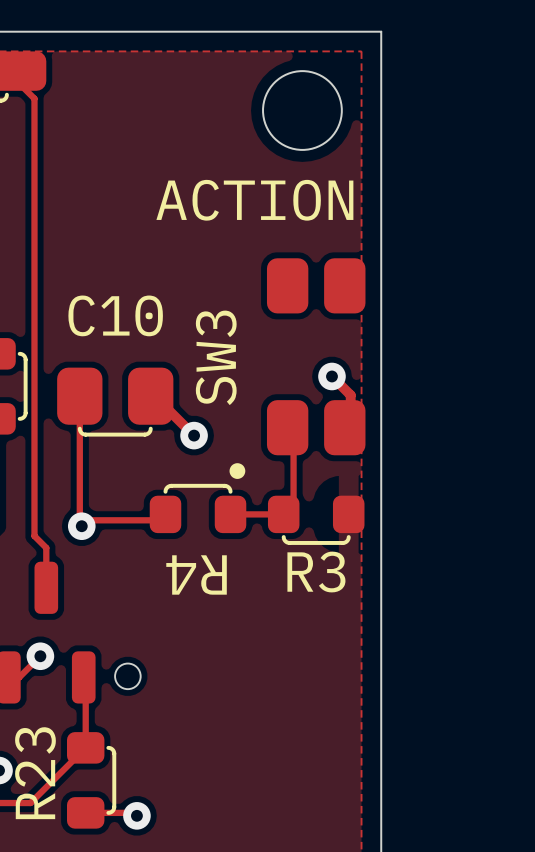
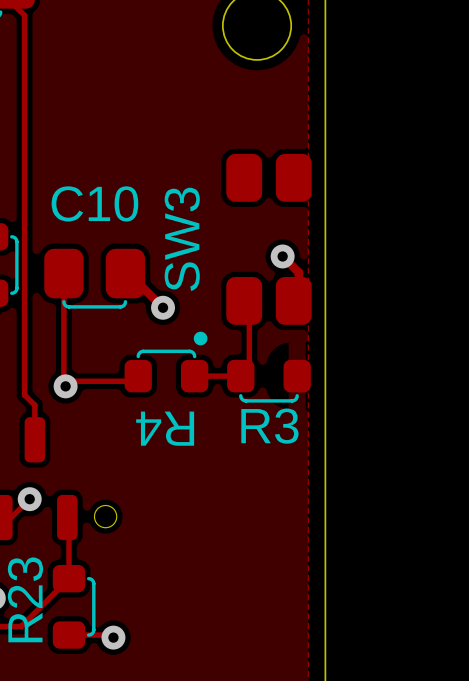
text: ACTION (254, 200) -> none

